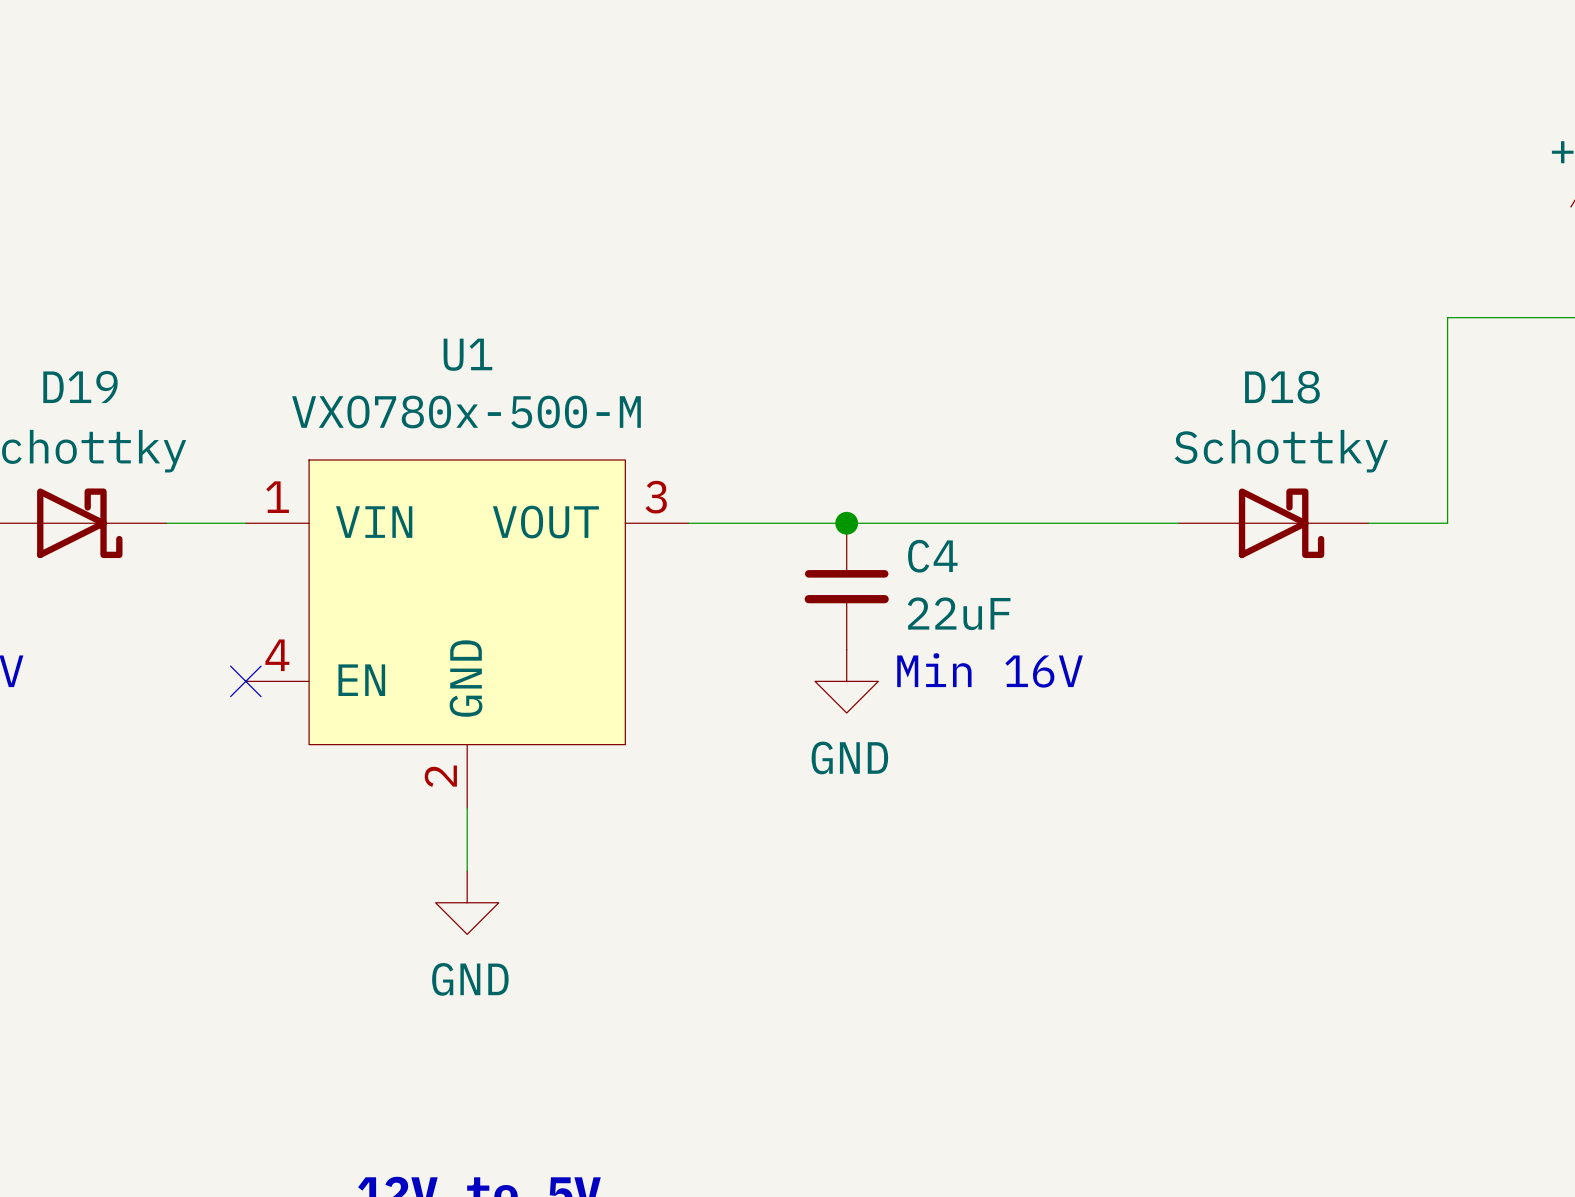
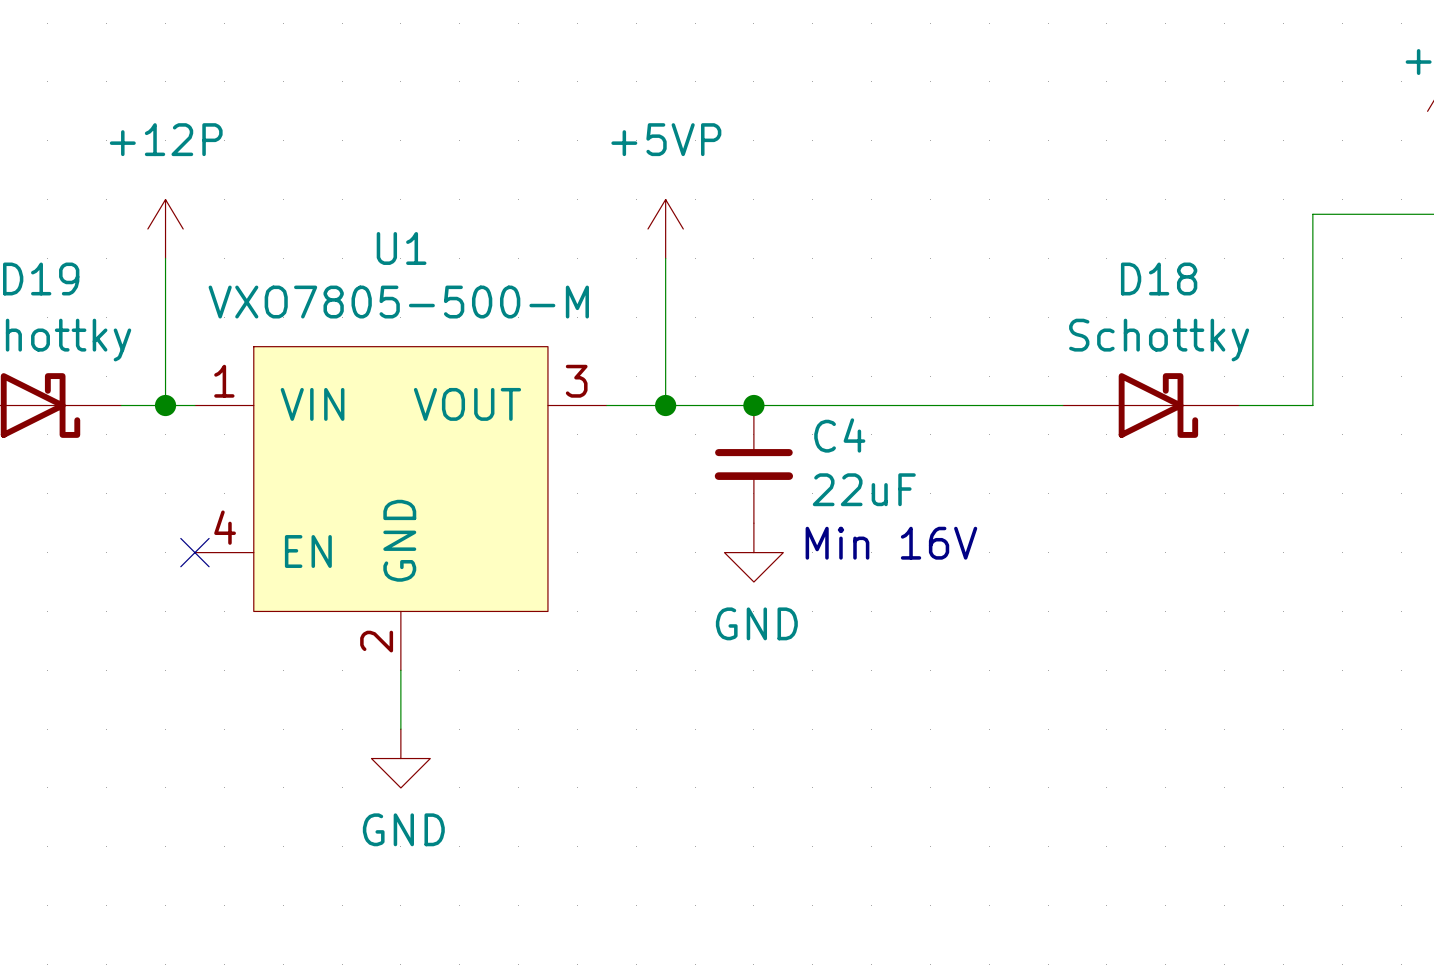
power symbol: none -> +12P (165, 229)
power symbol: none -> +5VP (665, 229)
wire: none -> (165, 258) (165, 405)
wire: none -> (665, 258) (665, 405)
U1 value: VXO780x-500-M (466, 412) -> VXO7805-500-M (398, 302)
junction: none -> (165, 405)
junction: none -> (665, 405)

